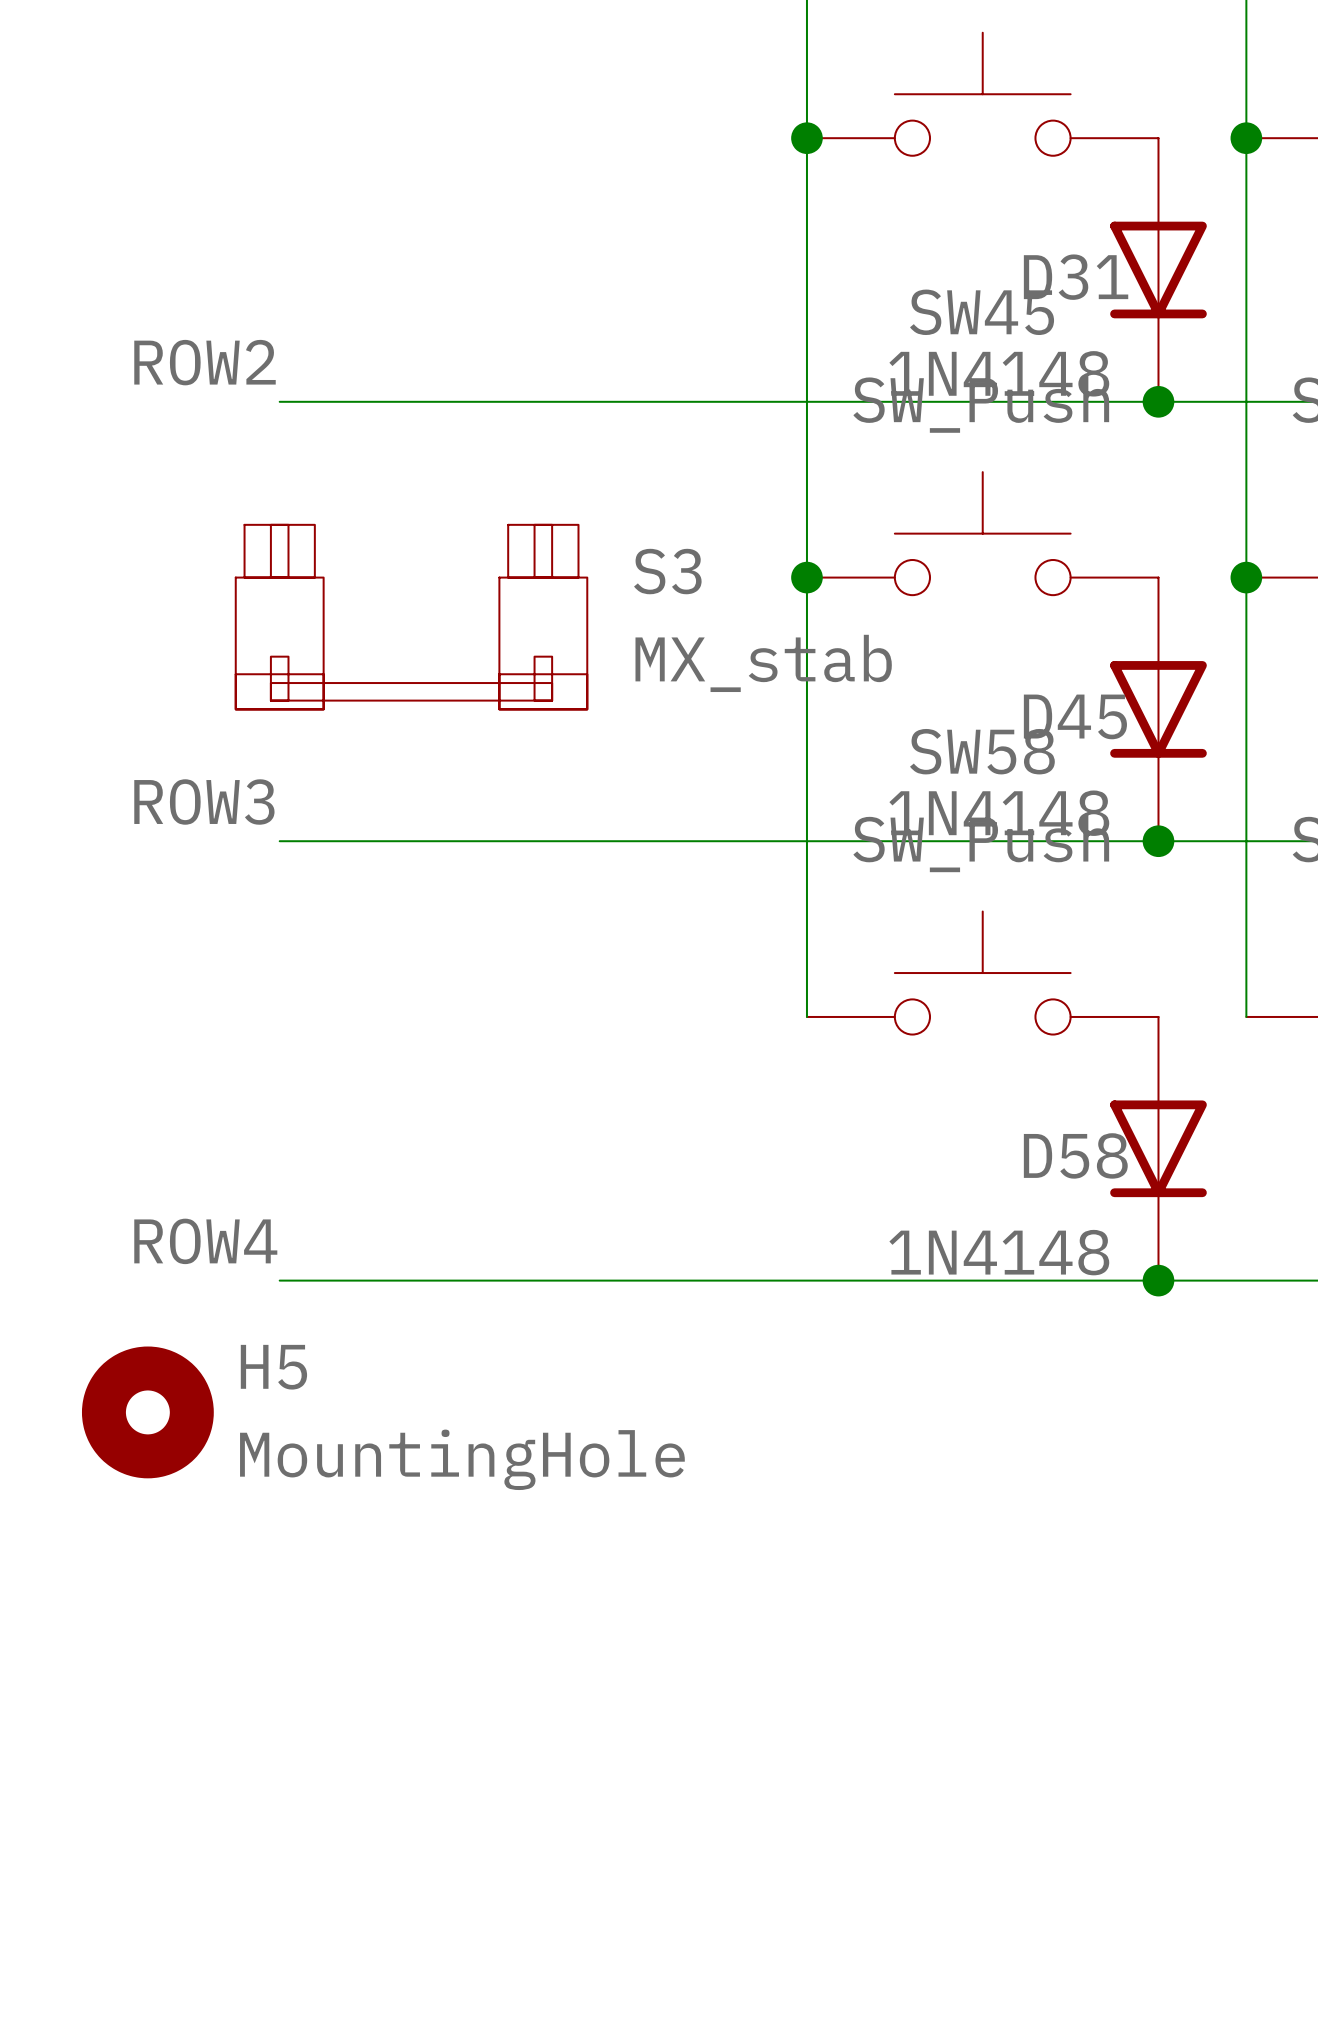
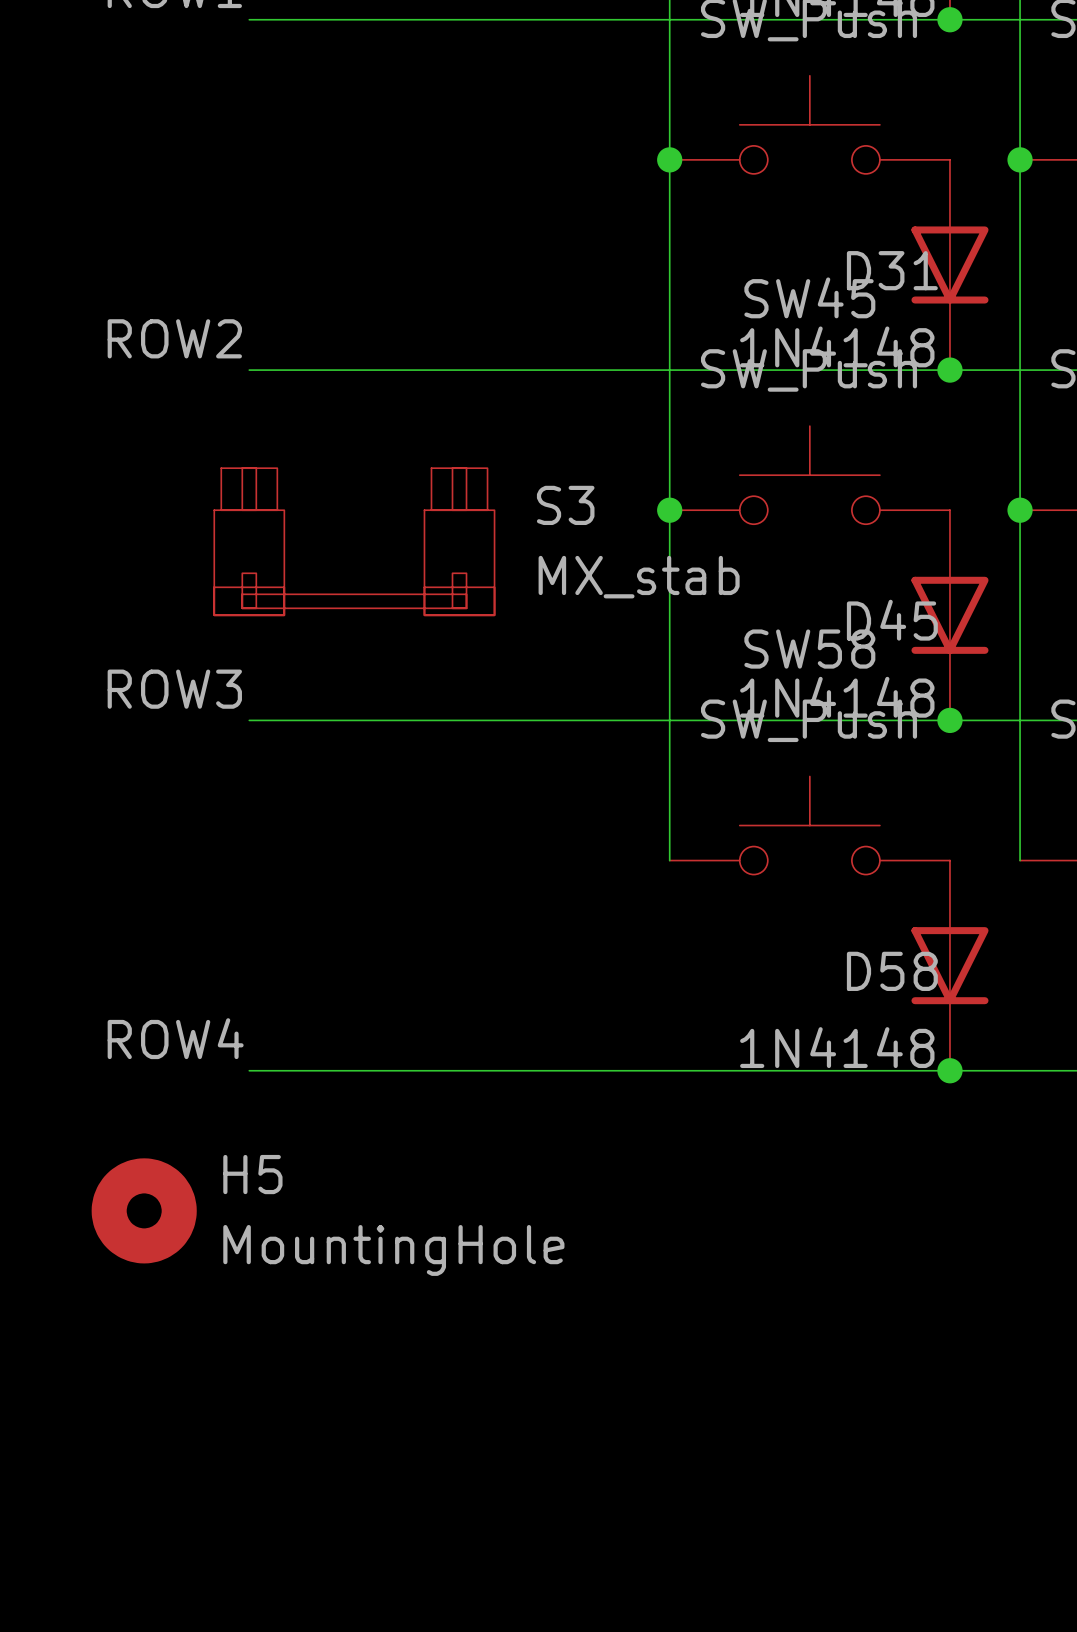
H5 position: (147, 1412) -> (144, 1210)

